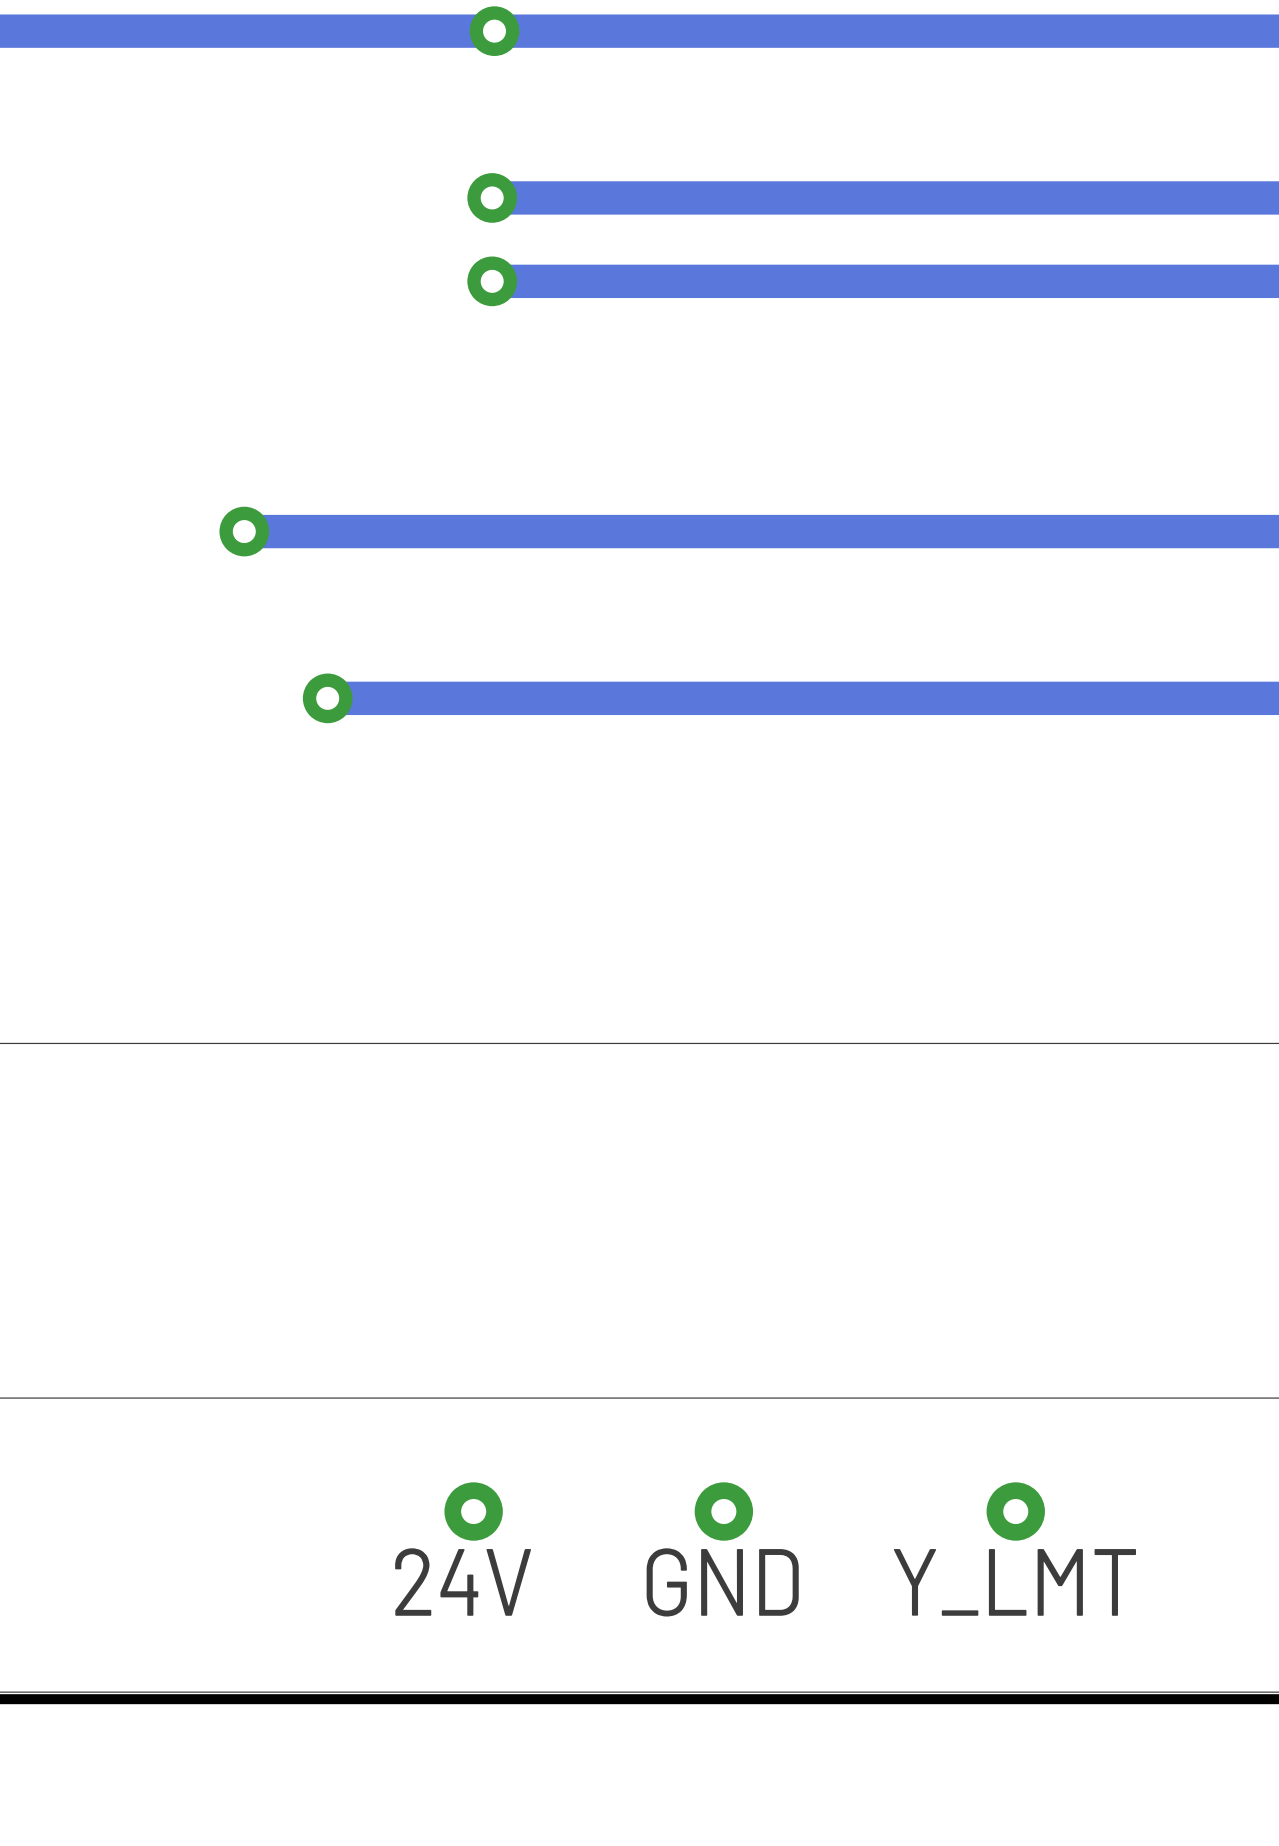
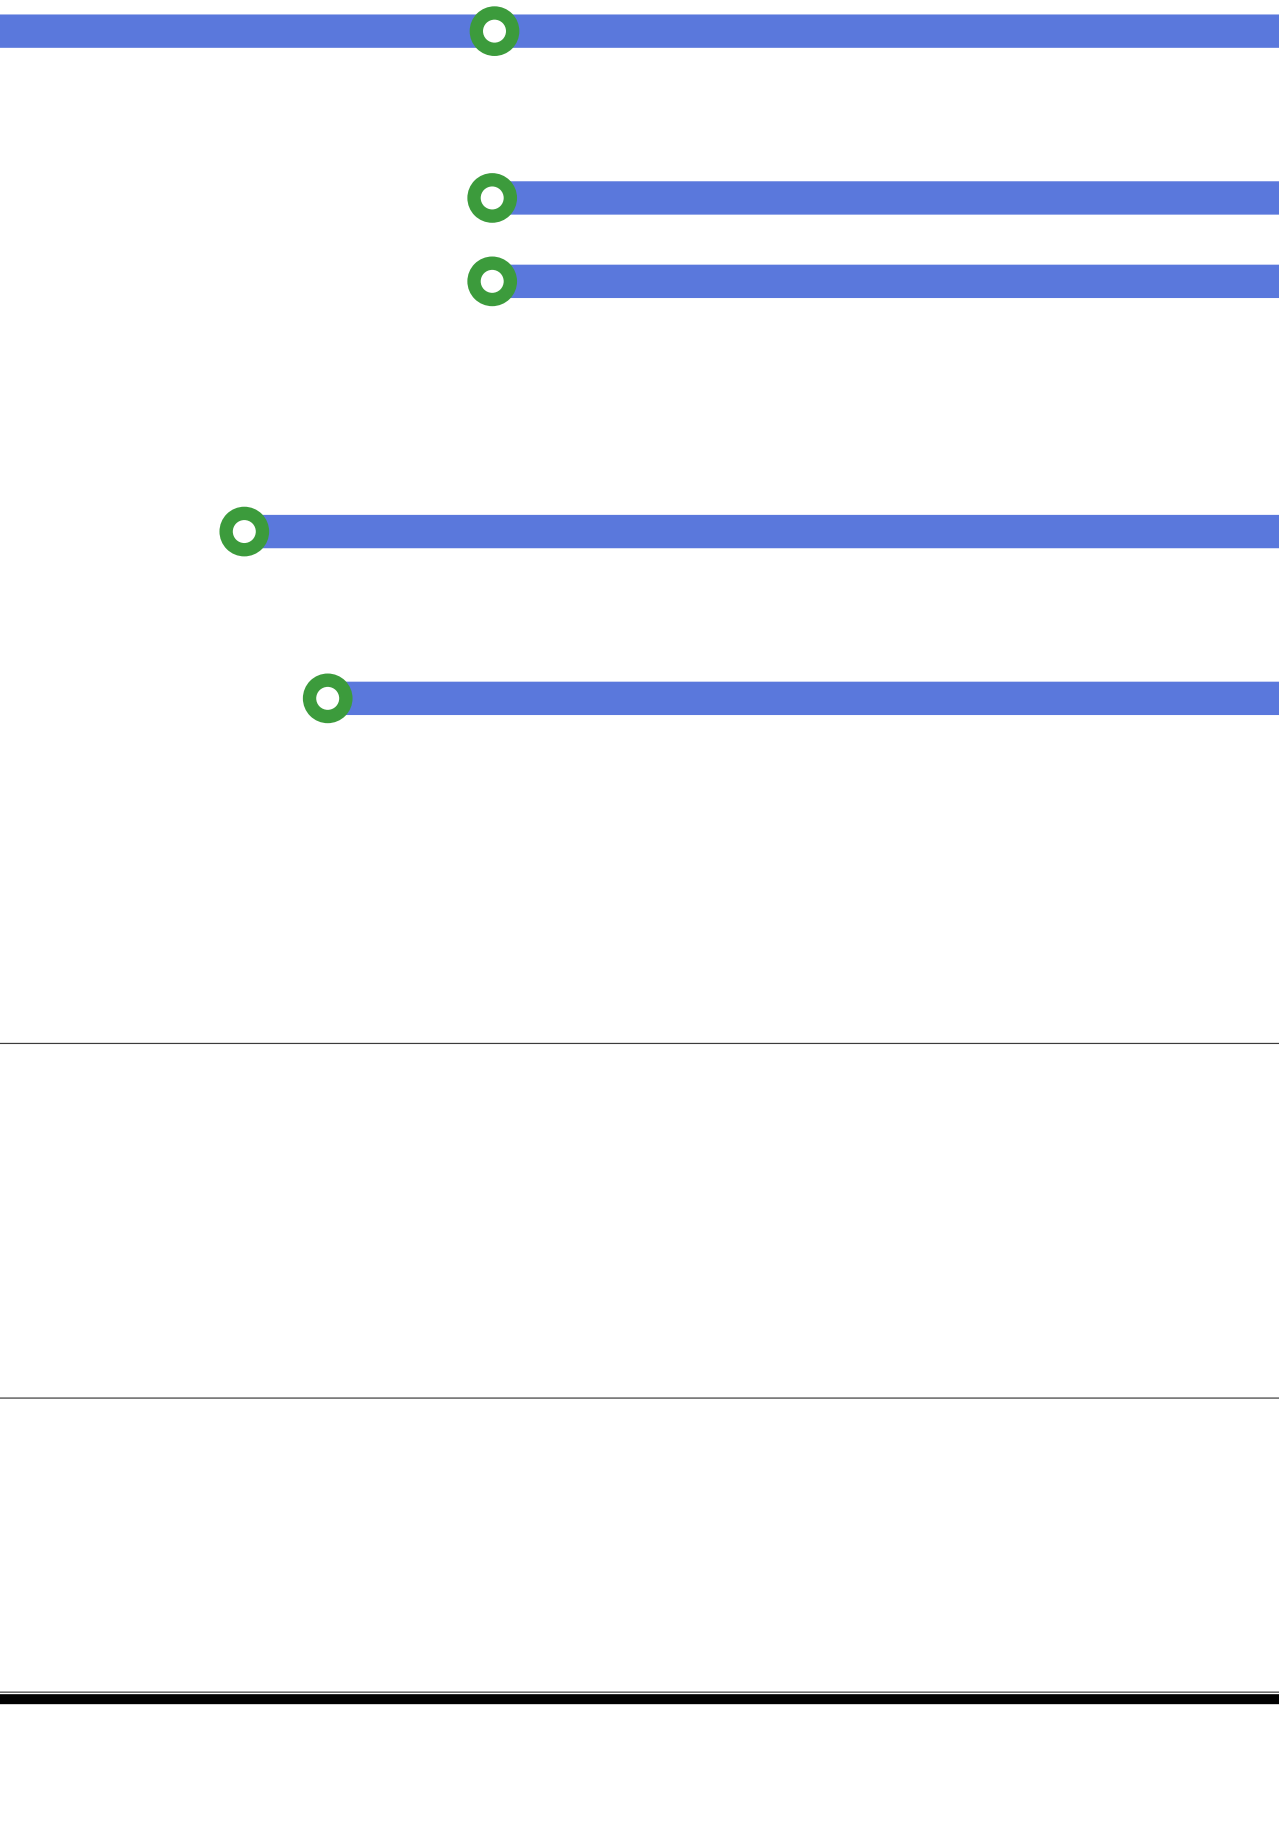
part: (473, 1511) -> none
part: (723, 1511) -> none
part: (1015, 1511) -> none
text: 24V (463, 1582) -> none
text: GND (722, 1582) -> none
text: Y_LMT (1014, 1582) -> none

